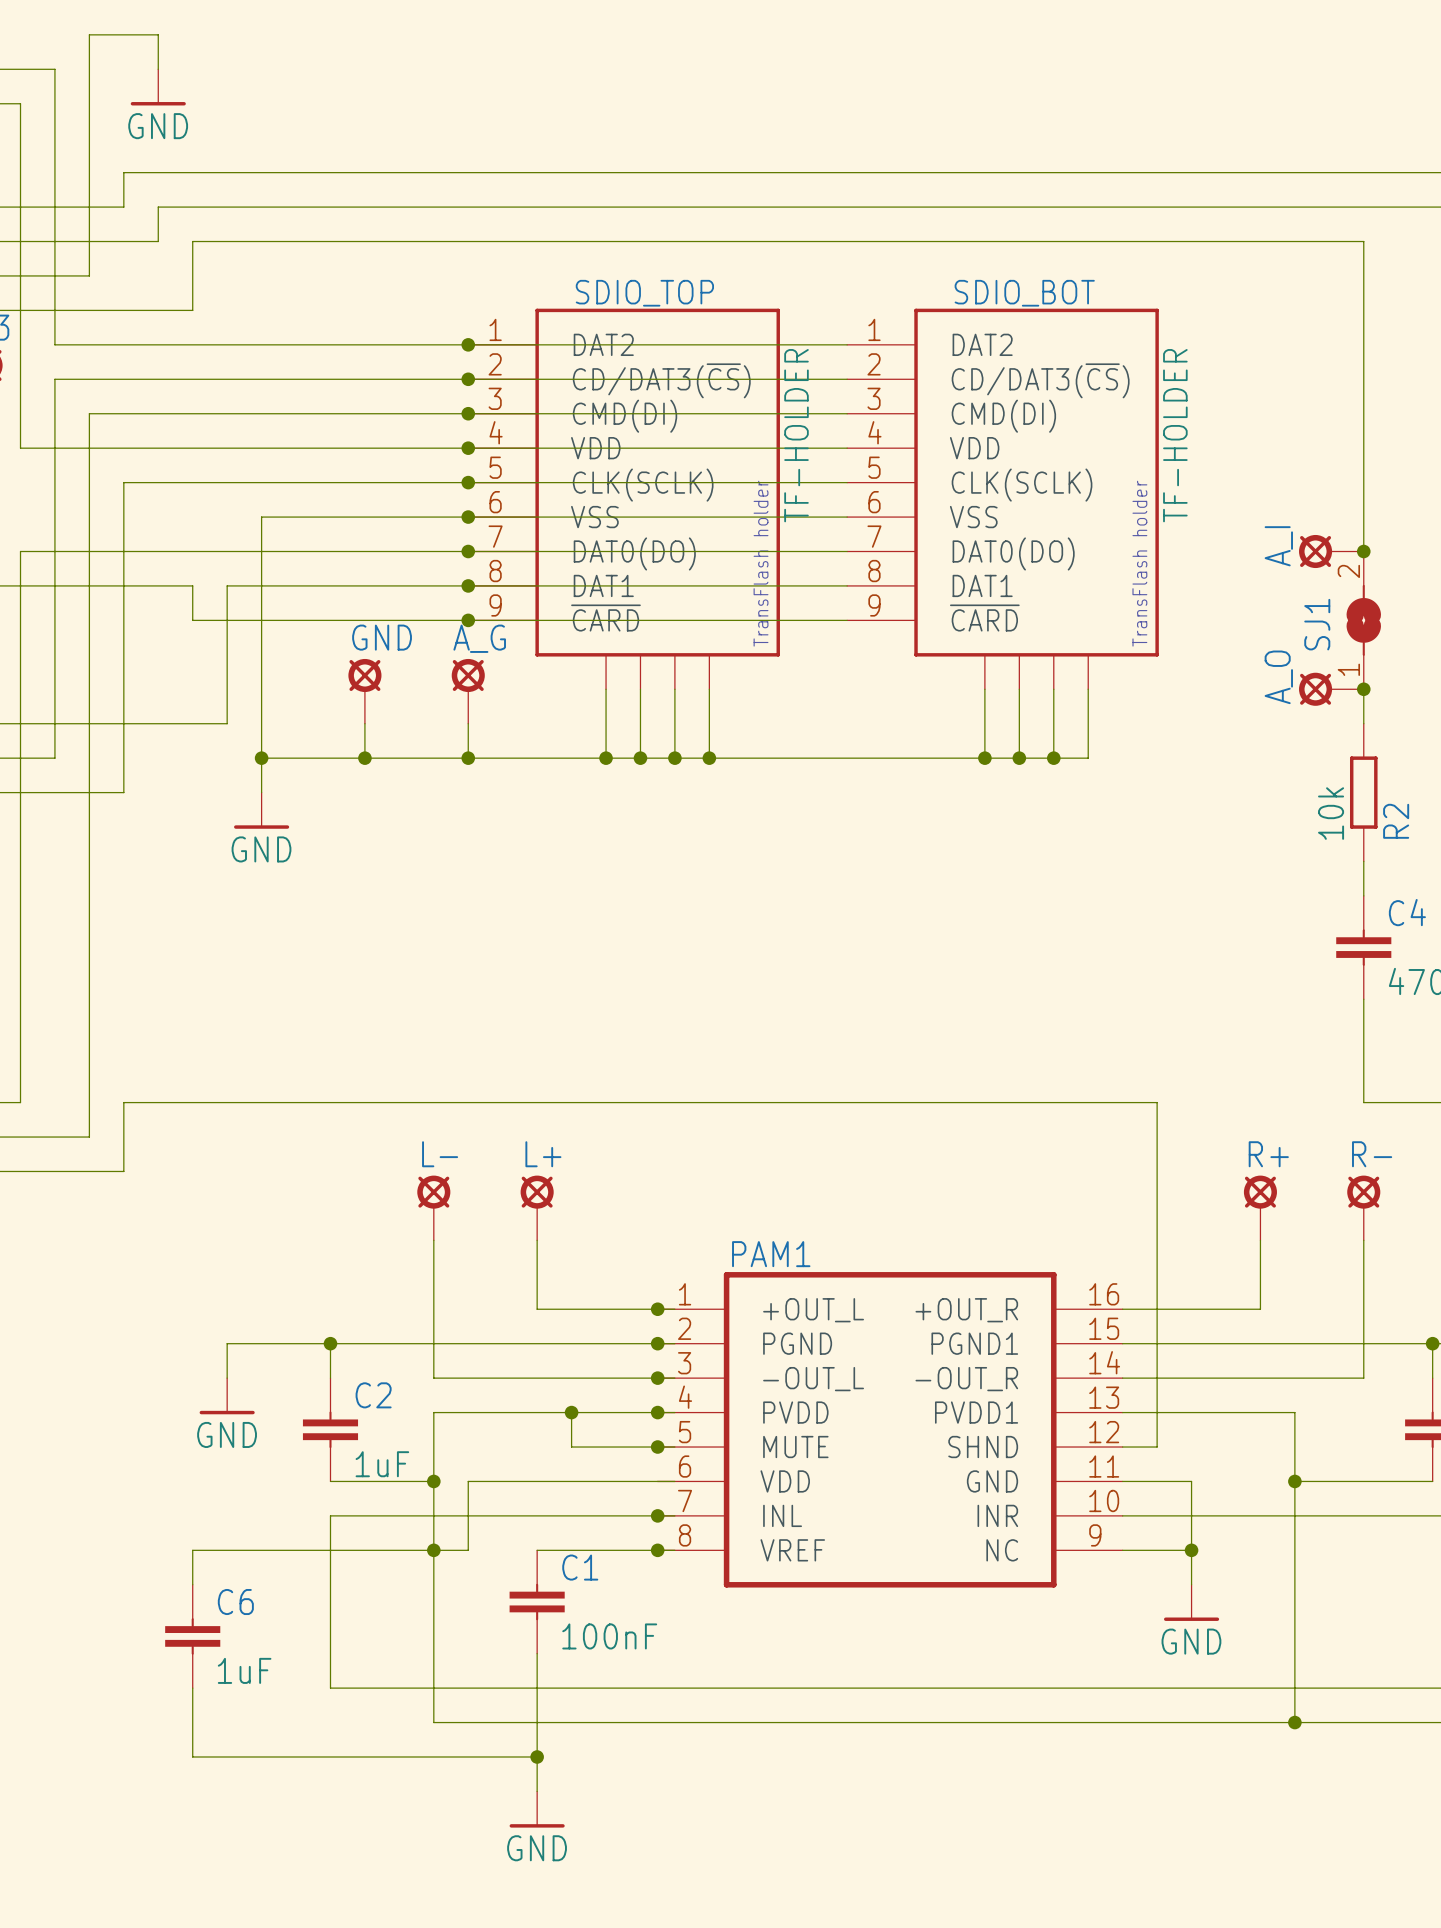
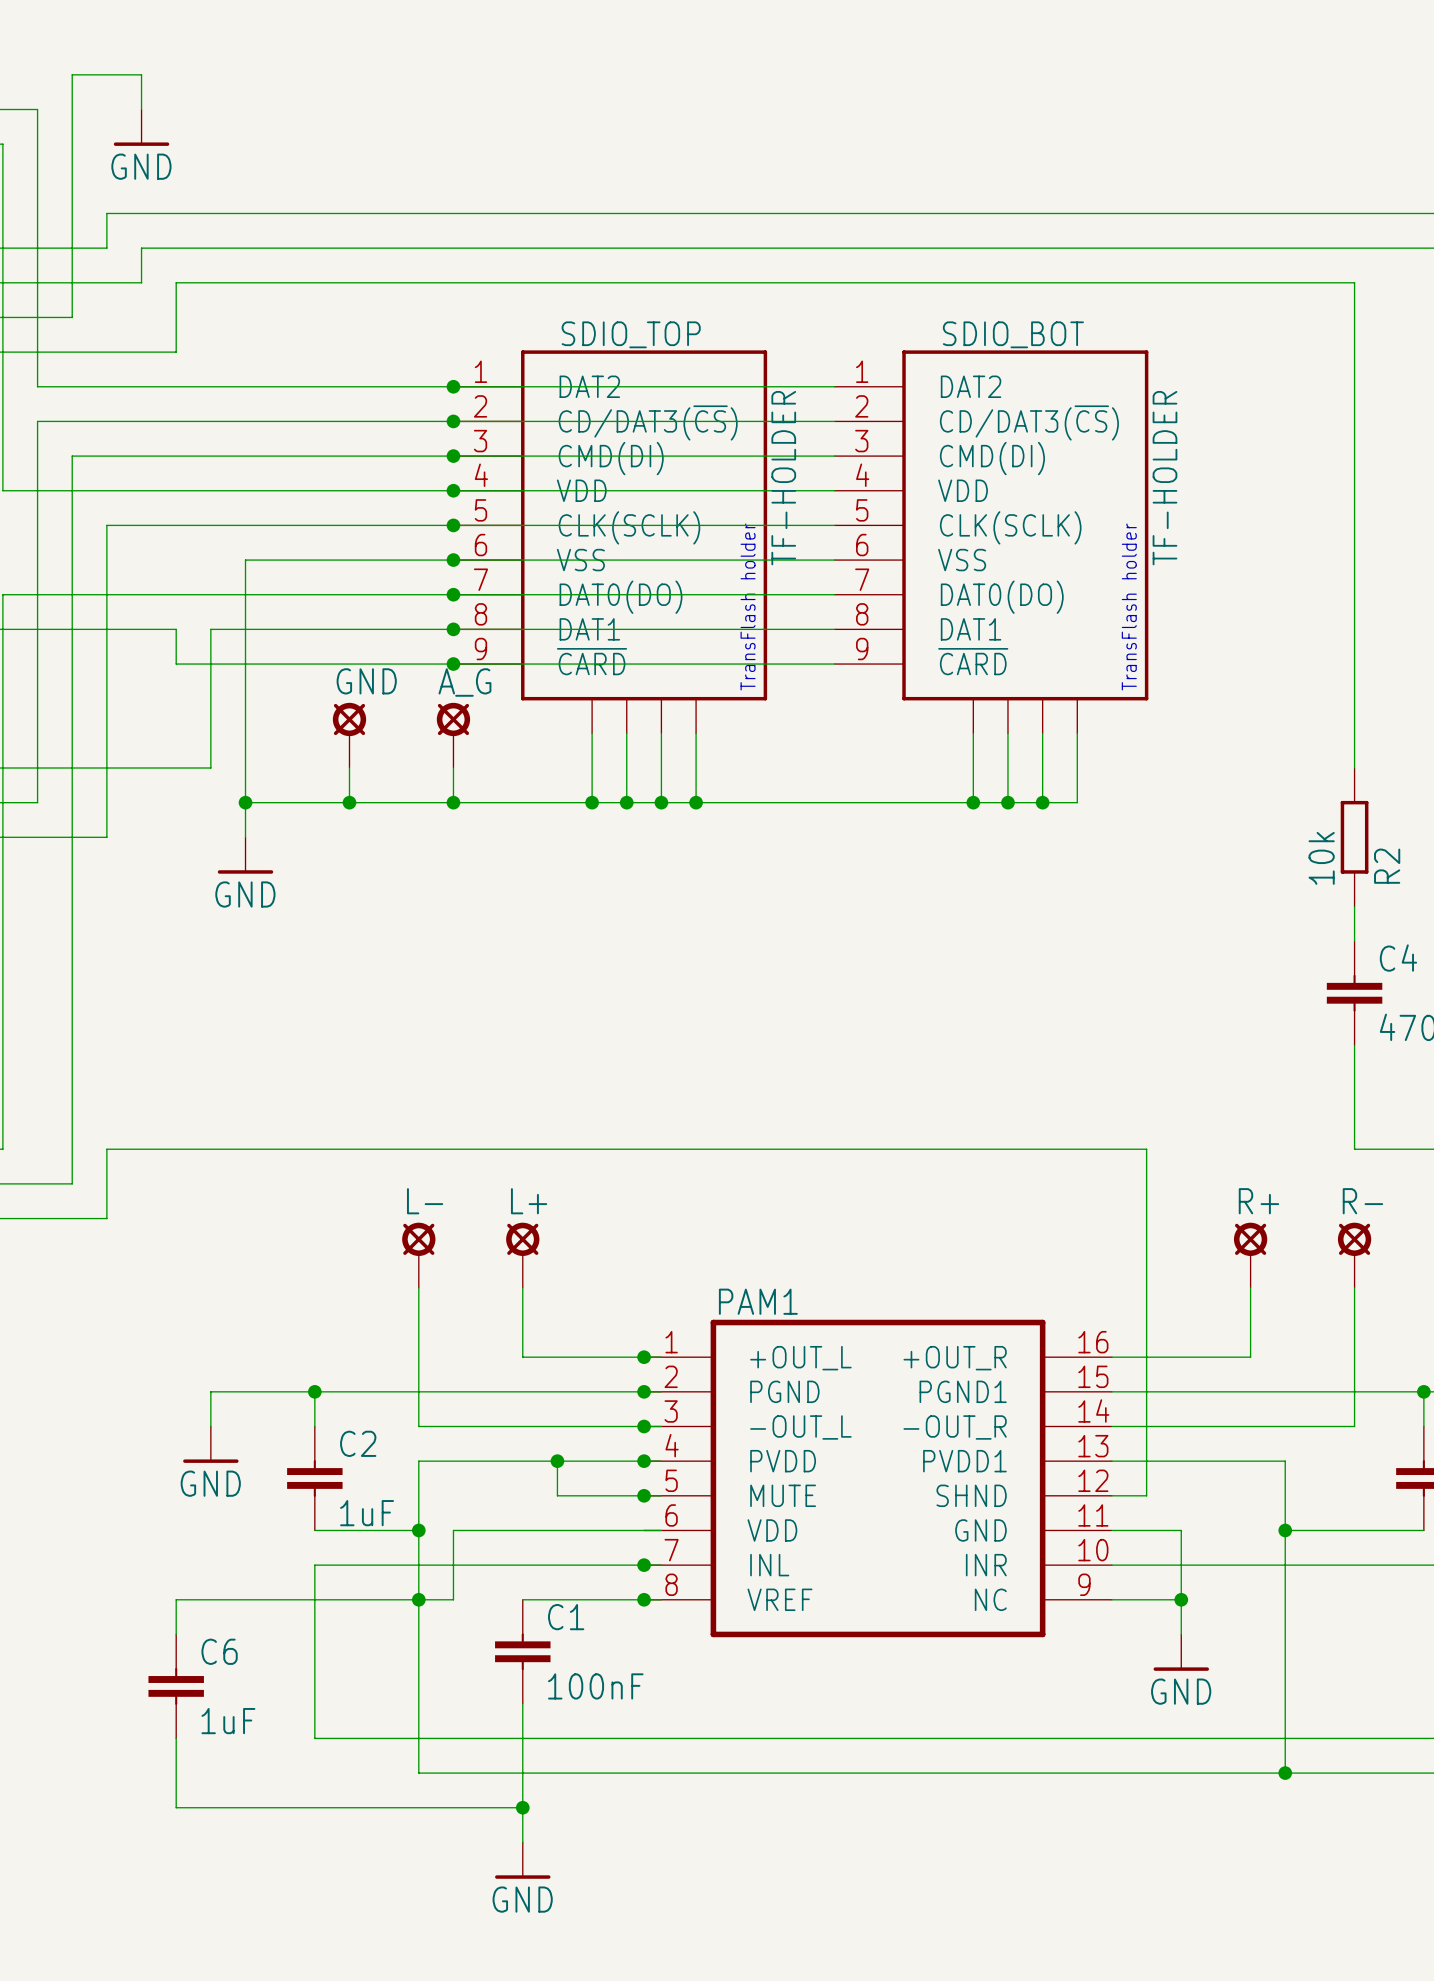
A_I: (1331, 551) -> none
junction: (1363, 551) -> none
SJ1: (1363, 620) -> none
A_O: (1331, 689) -> none
junction: (1363, 689) -> none

